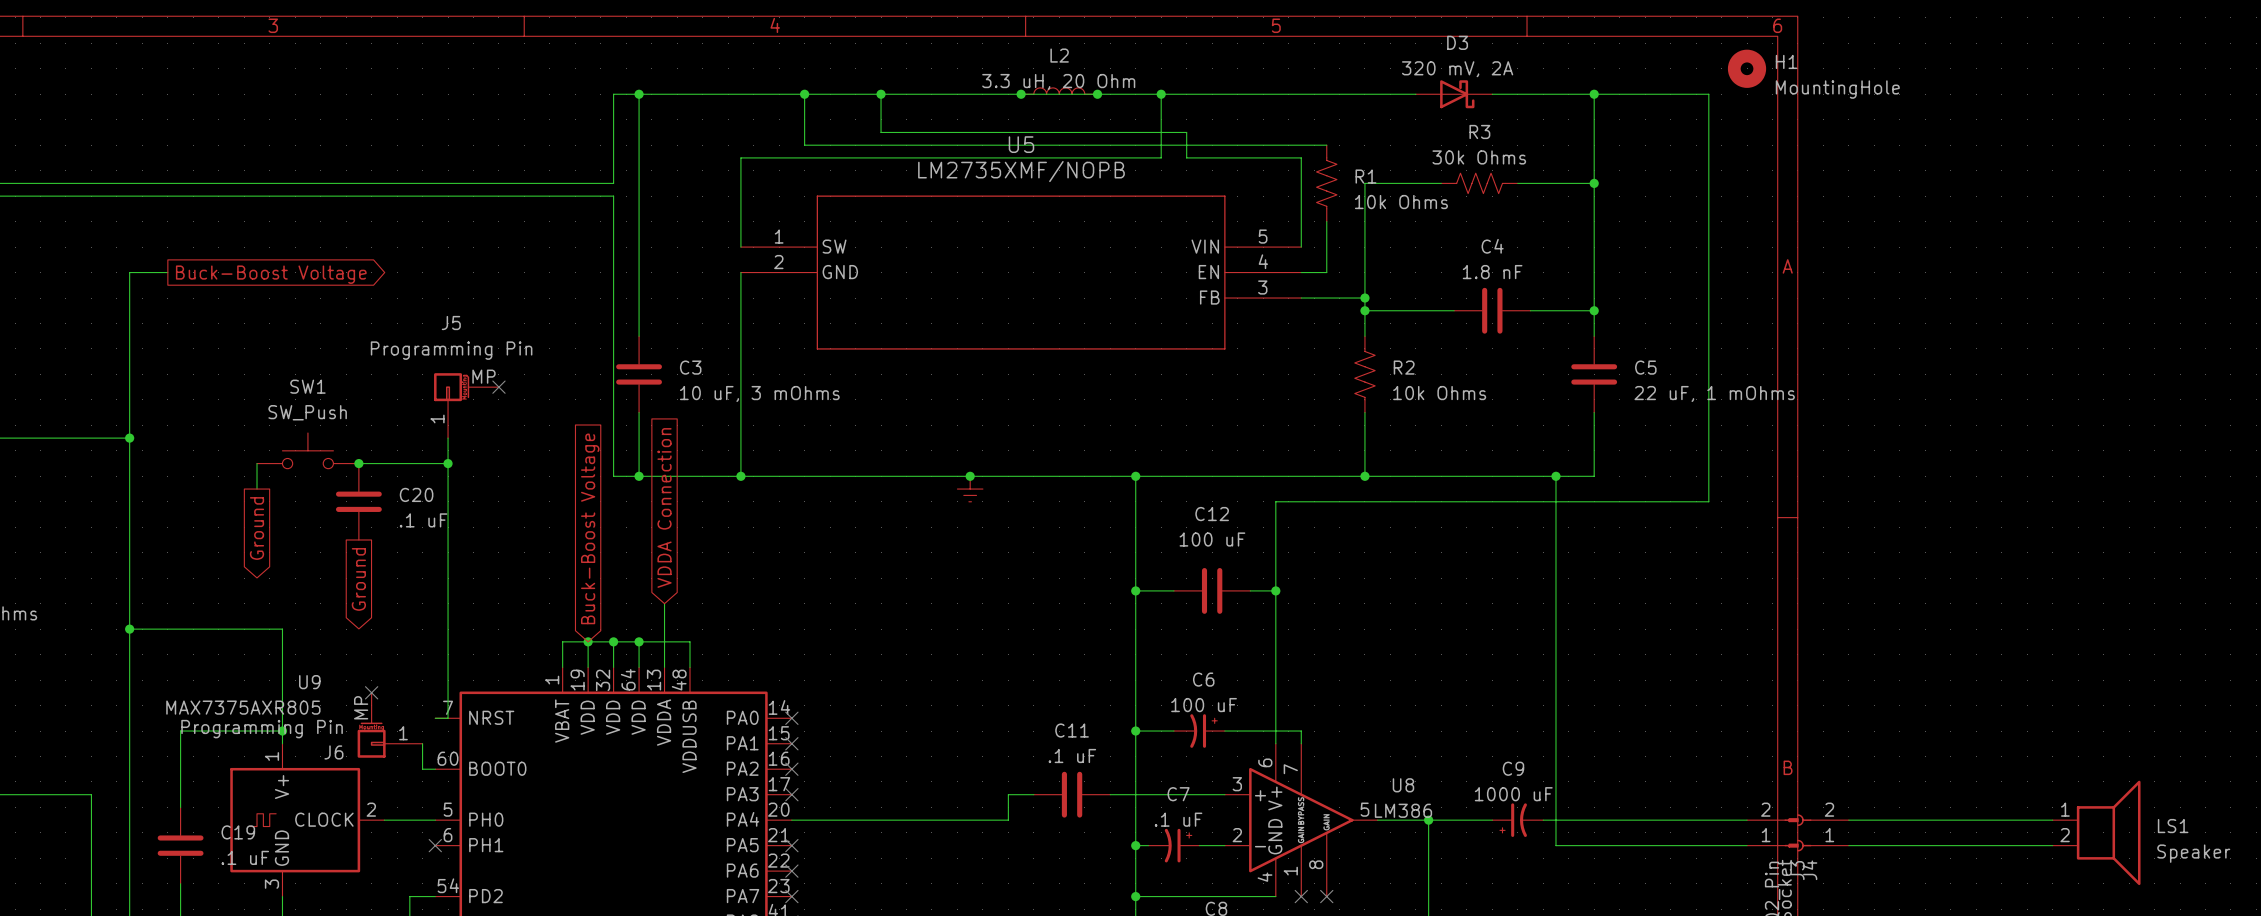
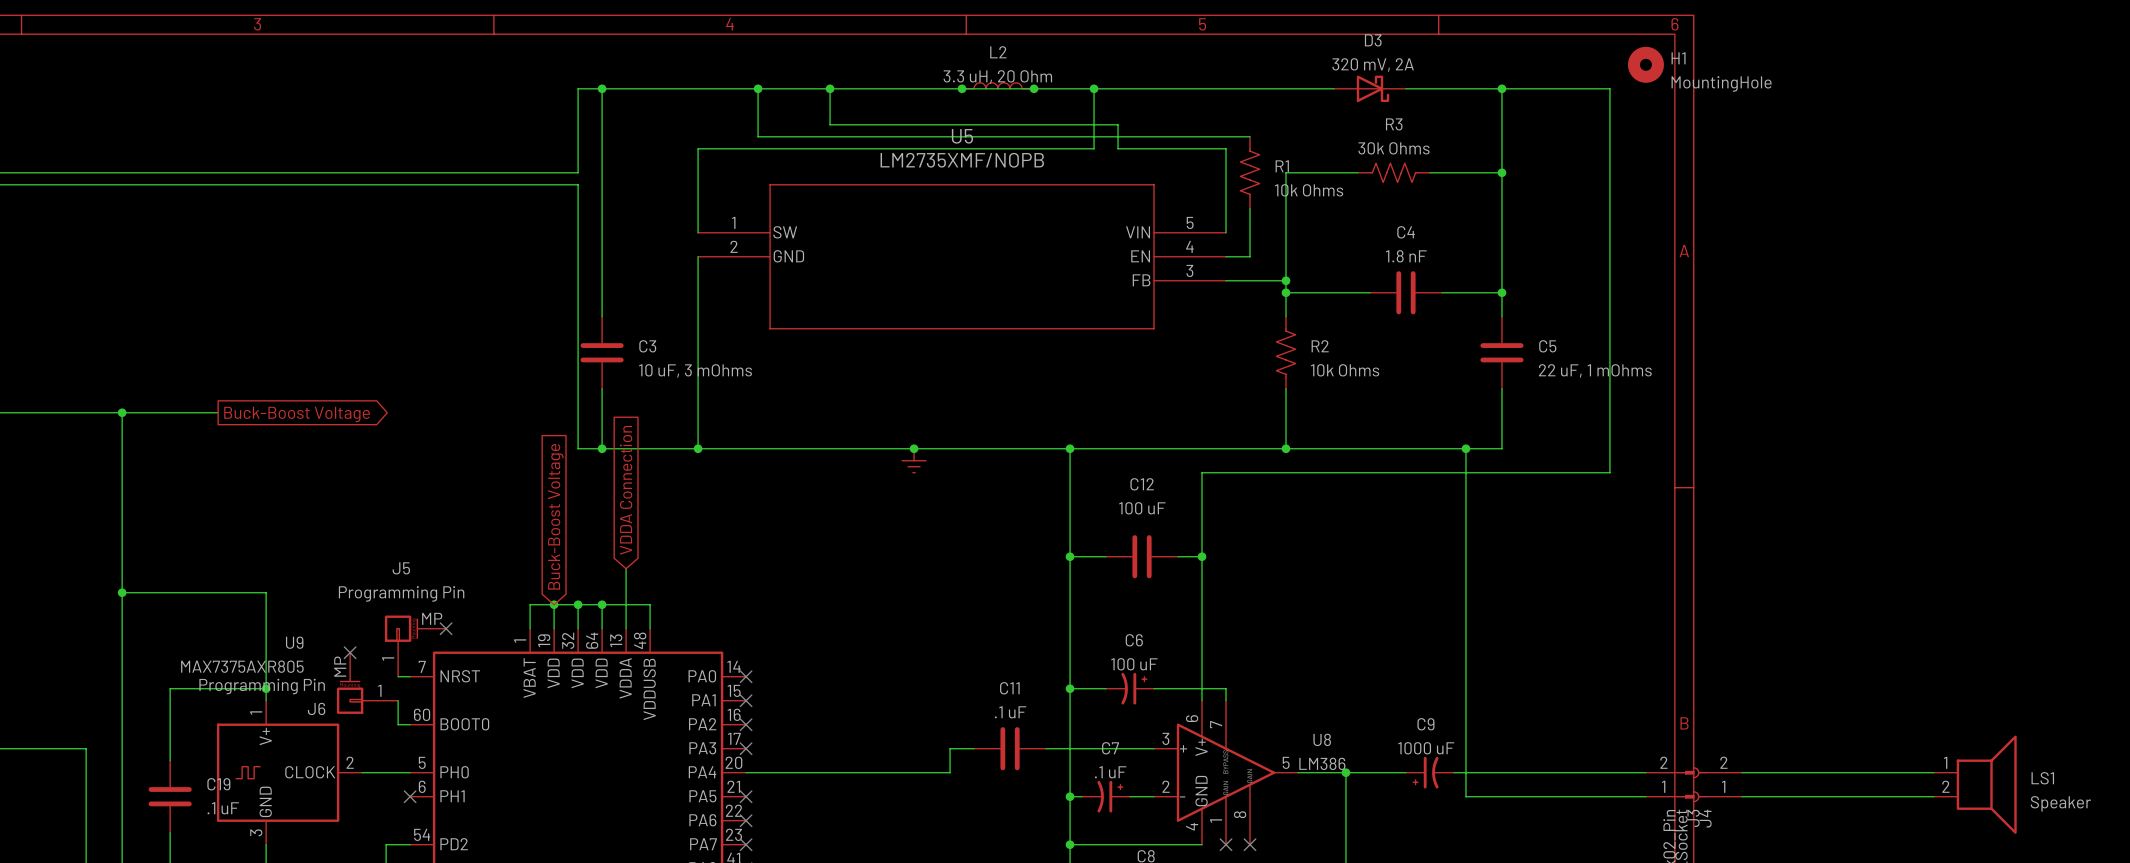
wire: (167, 272) (129, 272) (129, 438) -> (218, 412) (122, 412)
global label position: Buck-Boost Voltage (271, 274) -> Buck-Boost Voltage (297, 414)
no-connect mark: (498, 387) -> none
J5 position: (466, 405) -> (415, 646)
wire: (448, 438) (448, 718) (435, 718) -> (398, 676) (410, 676)
SW1: SW_Push (307, 450) -> none
wire: (257, 463) (257, 489) -> none
wire: (358, 463) (448, 463) -> none
junction: (358, 463) -> none
junction: (448, 463) -> none
C20: .1 uF (358, 501) -> none
global label: Ground (257, 528) -> none
global label: Ground (358, 579) -> none
no-connect mark: none -> (446, 628)

